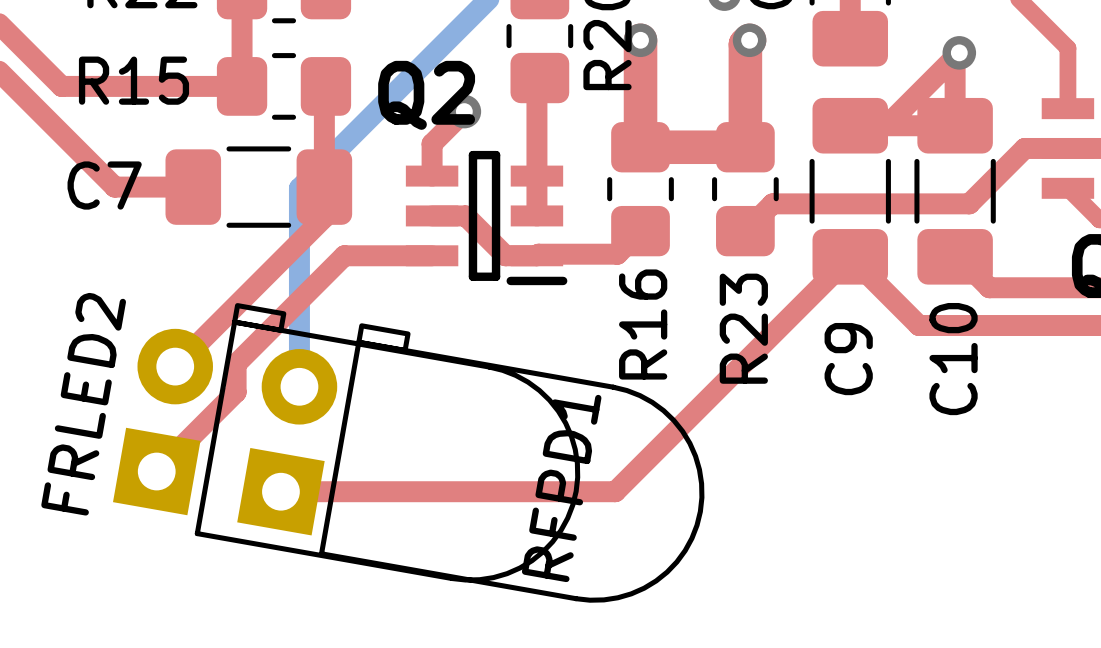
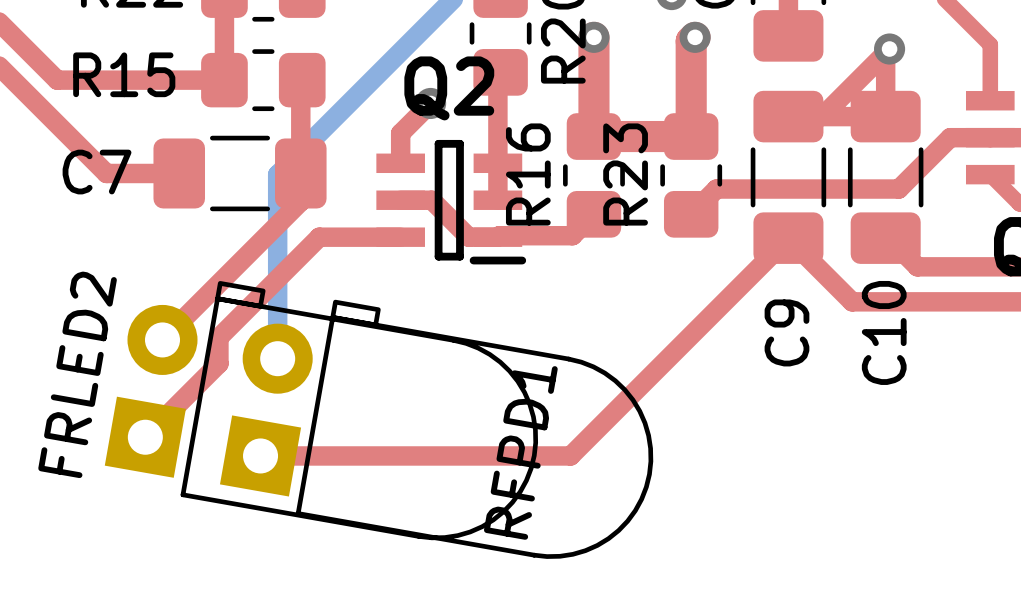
Q2 name position: Q2 (426, 95) -> Q2 (449, 88)
R16 name position: R16 (643, 324) -> R16 (528, 174)
R23 name position: R23 (743, 328) -> R23 (625, 174)

